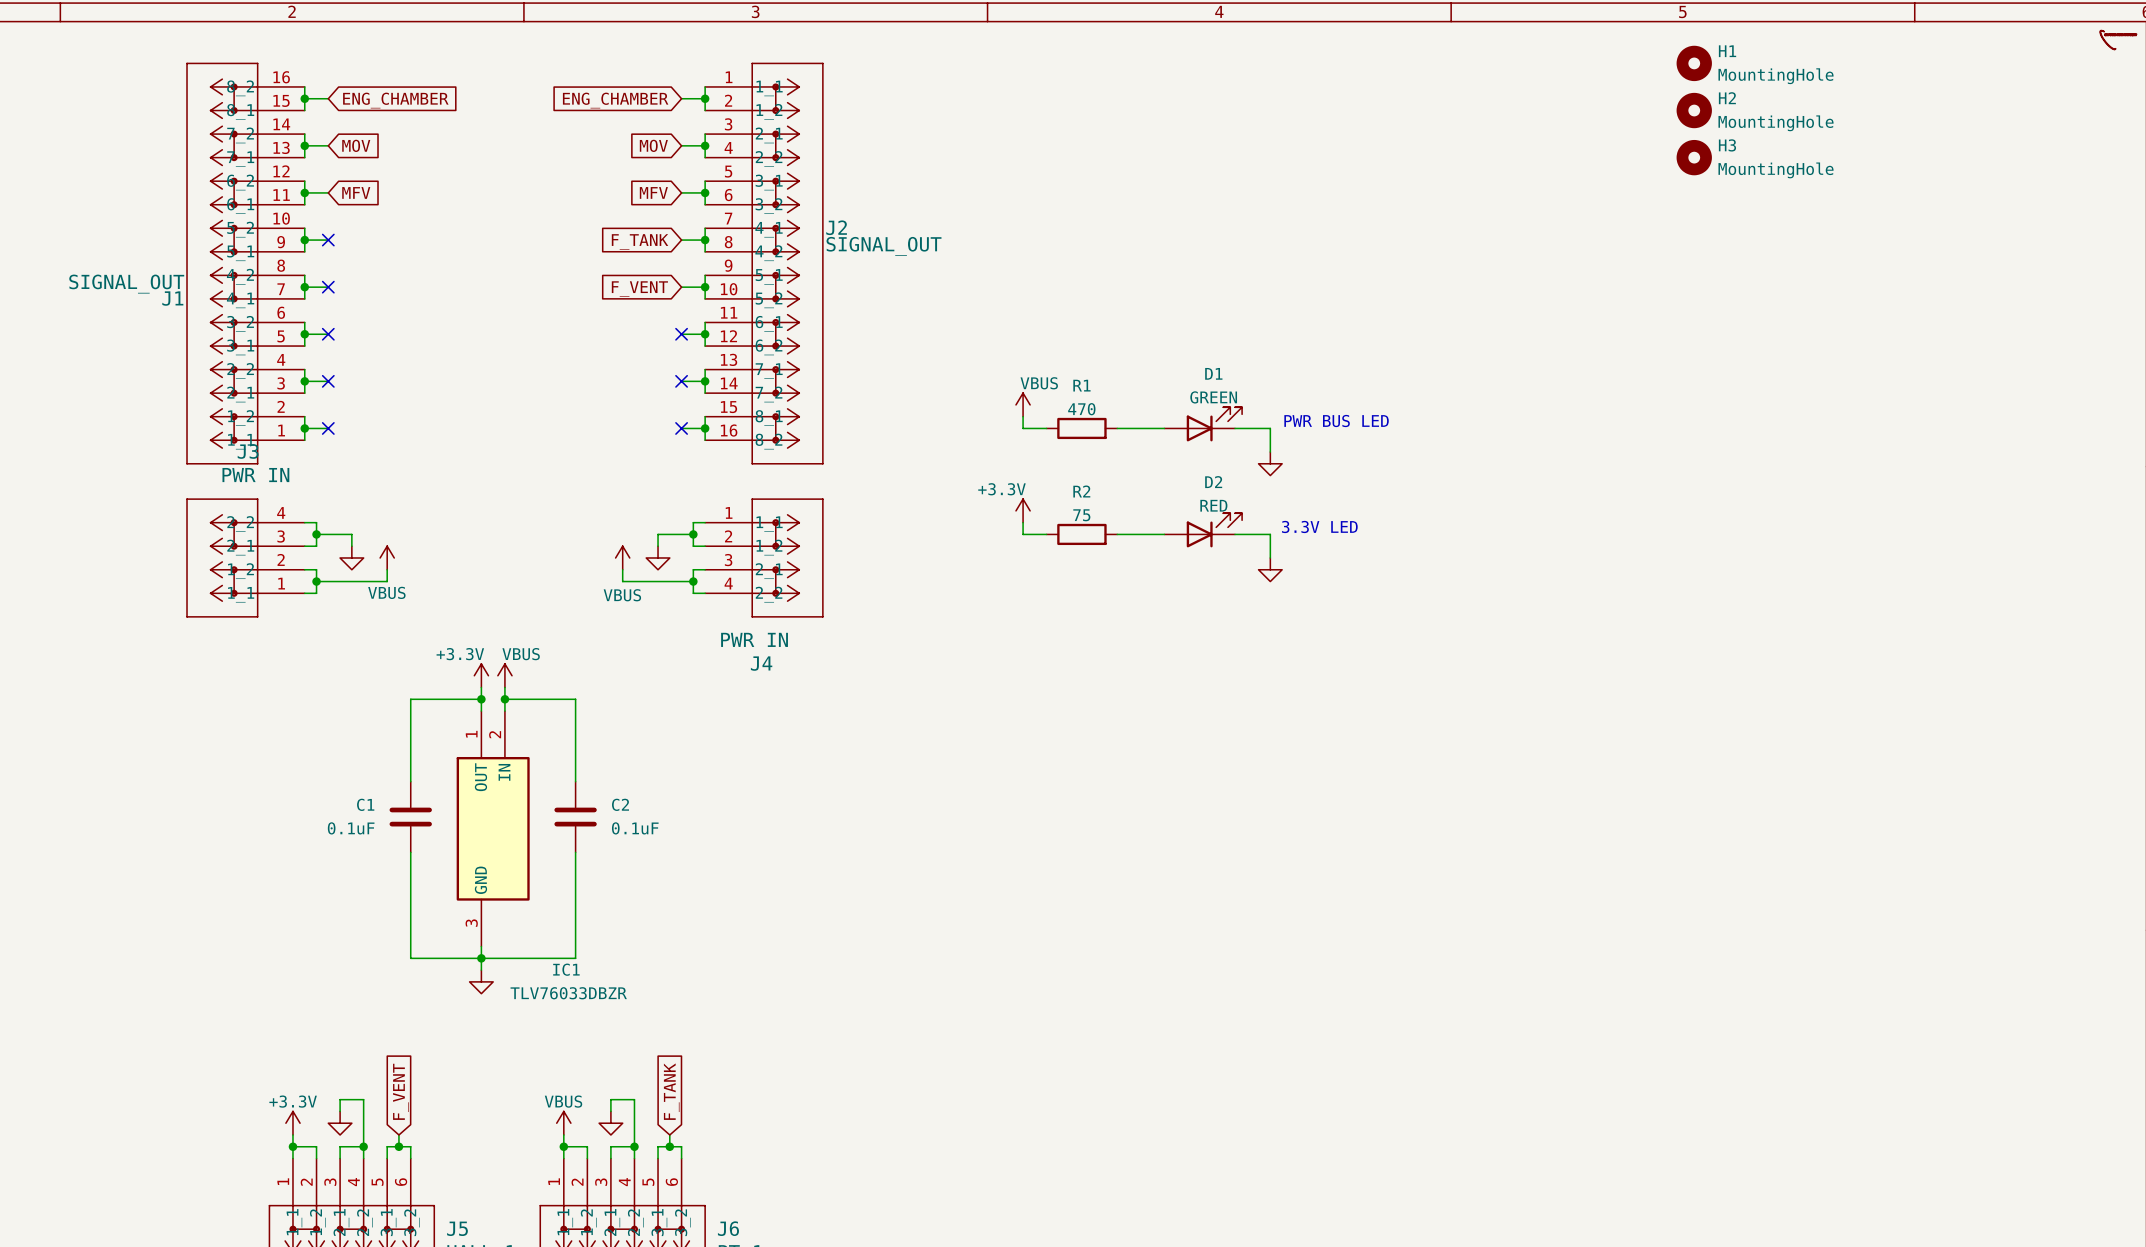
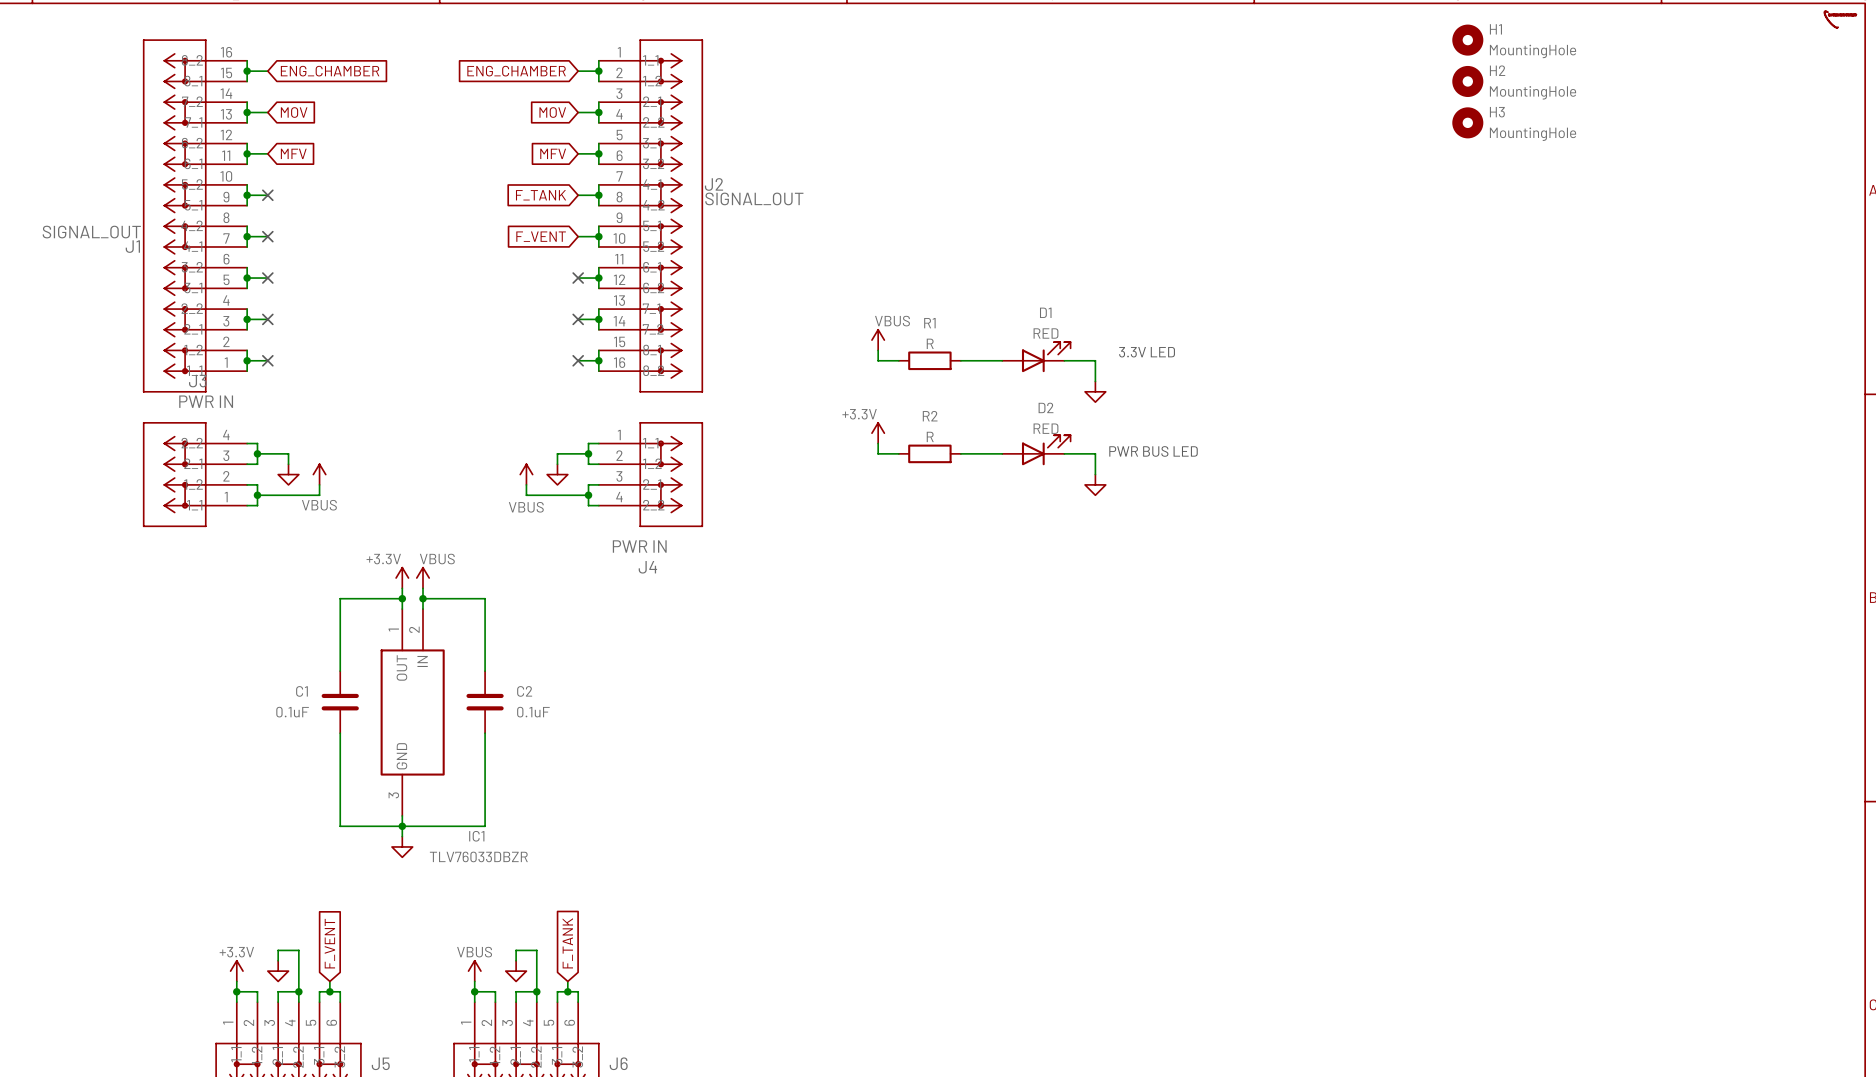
D1 value: GREEN (1213, 397) -> RED (1045, 333)
R1 value: 470 (1081, 409) -> R (930, 343)
text: PWR BUS LED (1336, 421) -> 3.3V LED (1147, 352)
R2 value: 75 (1081, 515) -> R (930, 436)
text: 3.3V LED (1319, 526) -> none
text: none -> PWR BUS LED (1153, 451)

